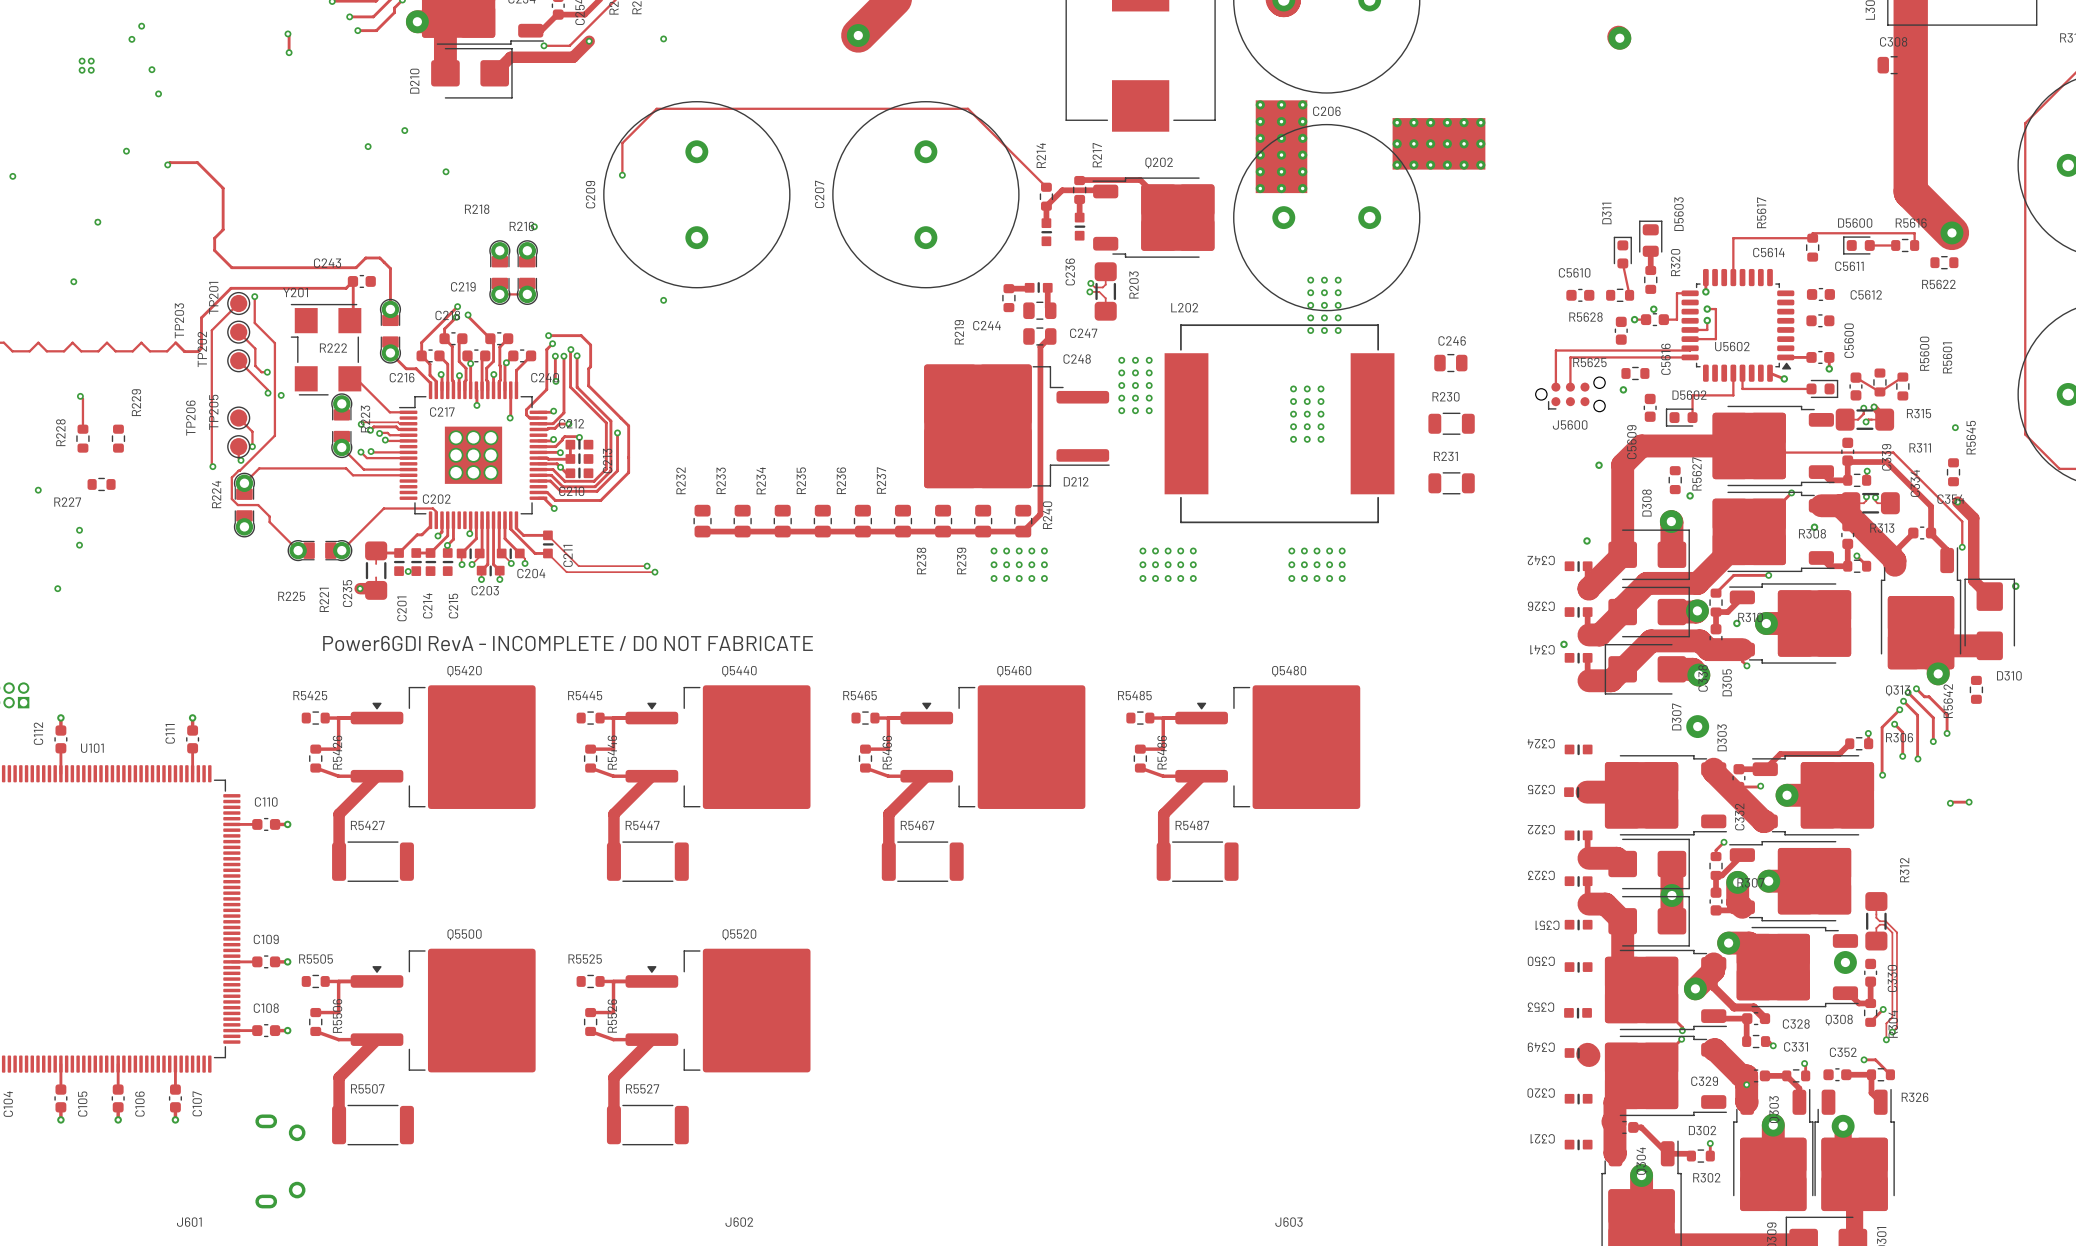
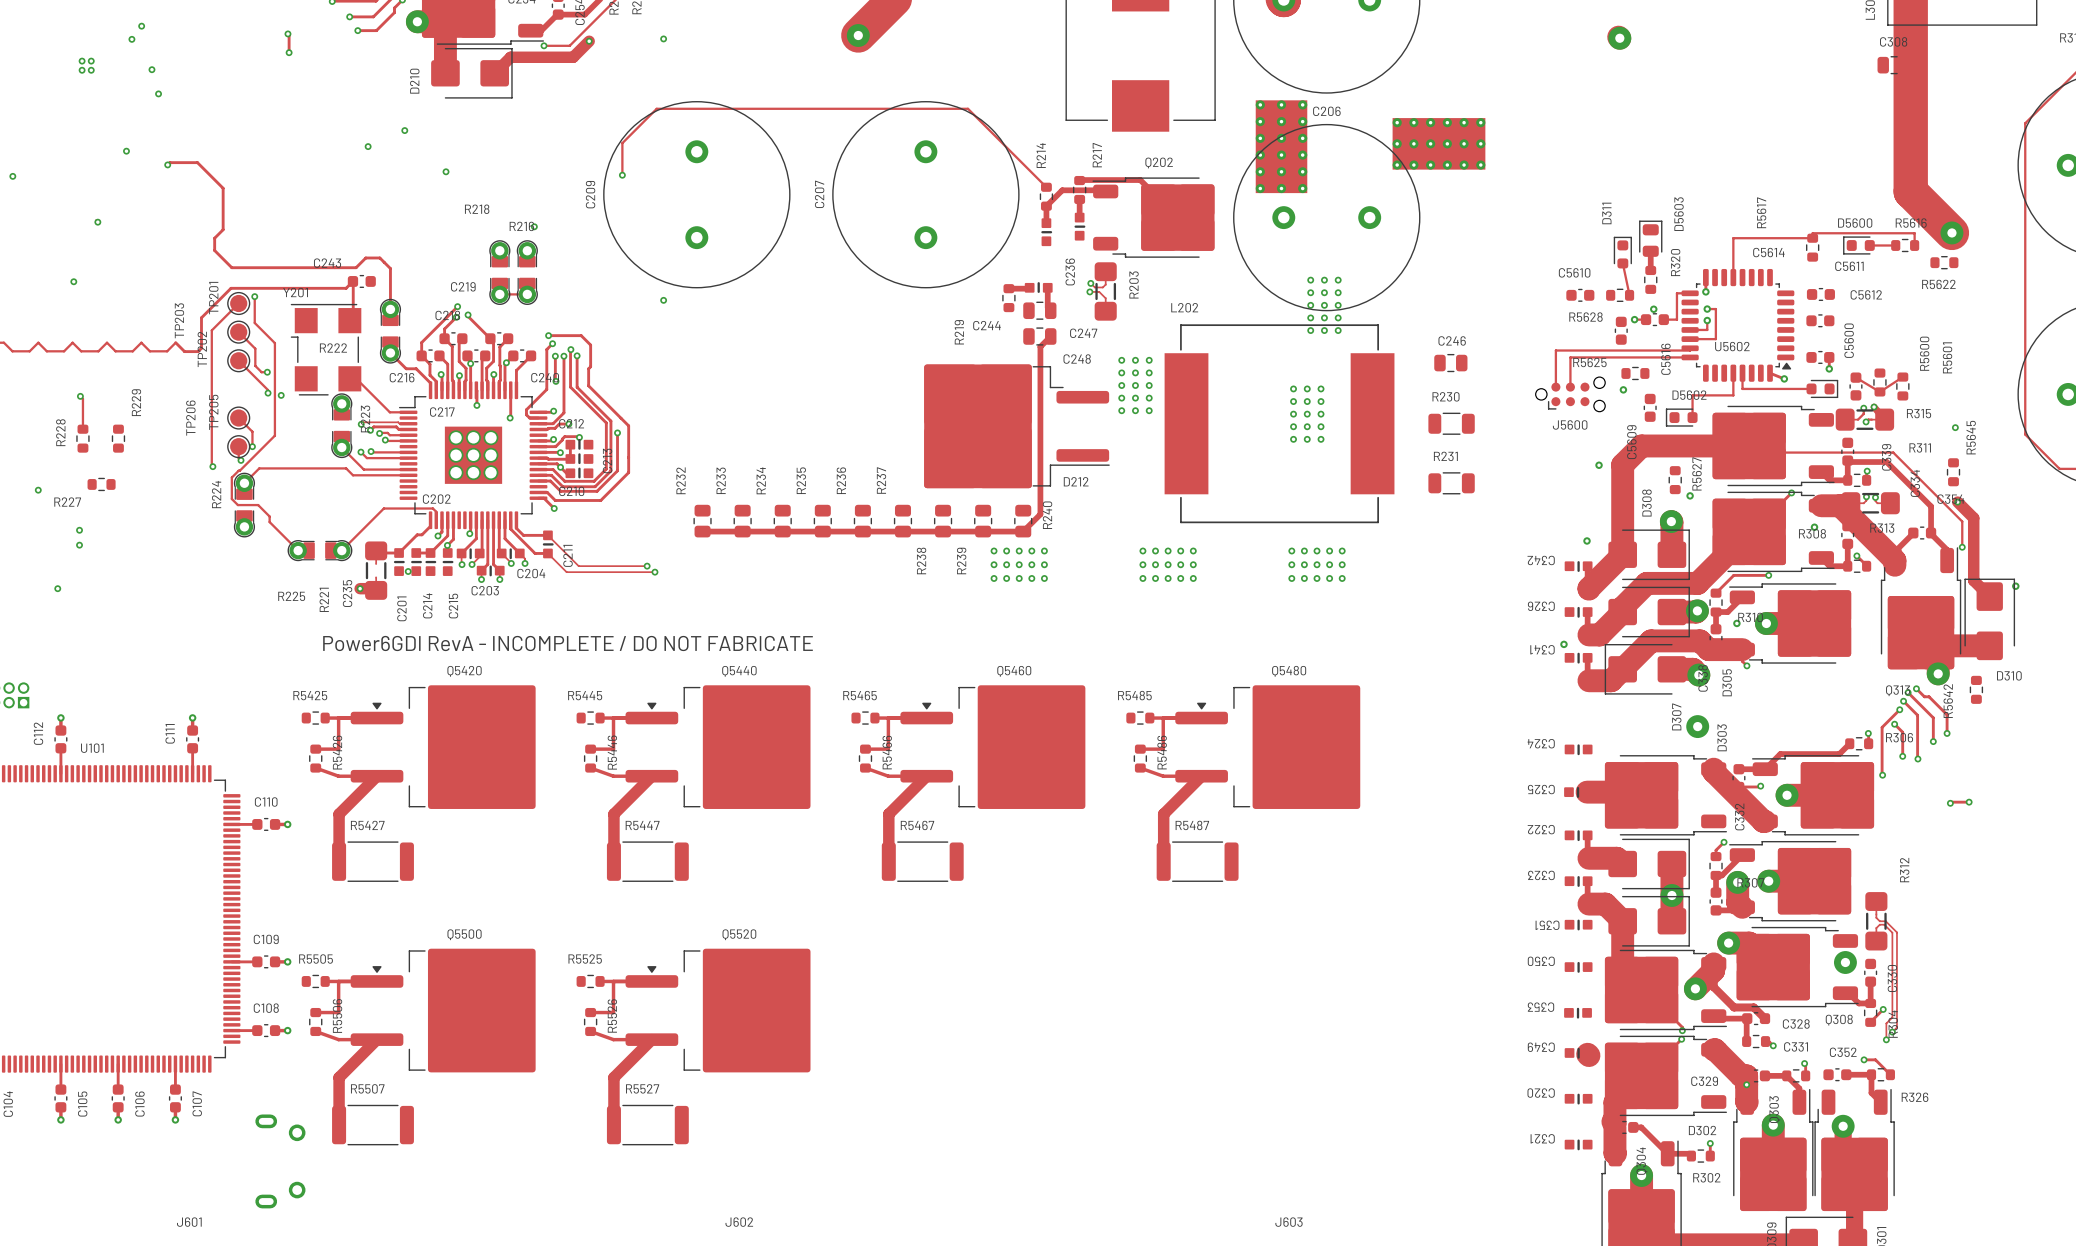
track: (1785, 357) (1811, 357) -> none

